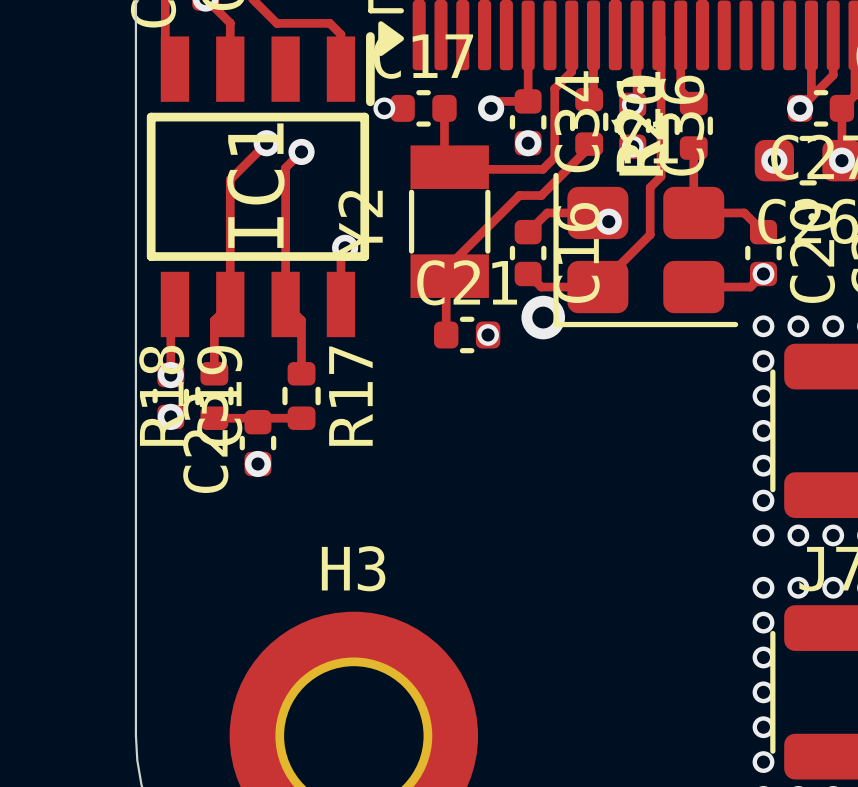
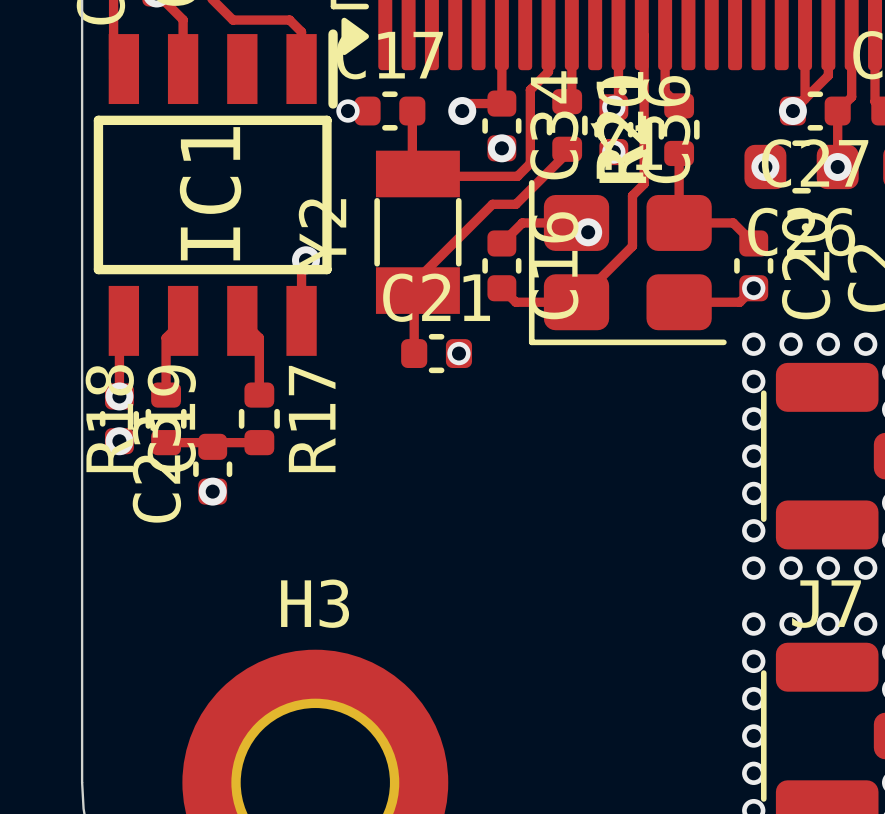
track: (266, 143) (230, 179) (230, 304) -> none
via: (266, 143) -> none
track: (301, 151) (285, 167) (285, 304) -> none
via: (301, 151) -> none
via: (543, 317) -> none

